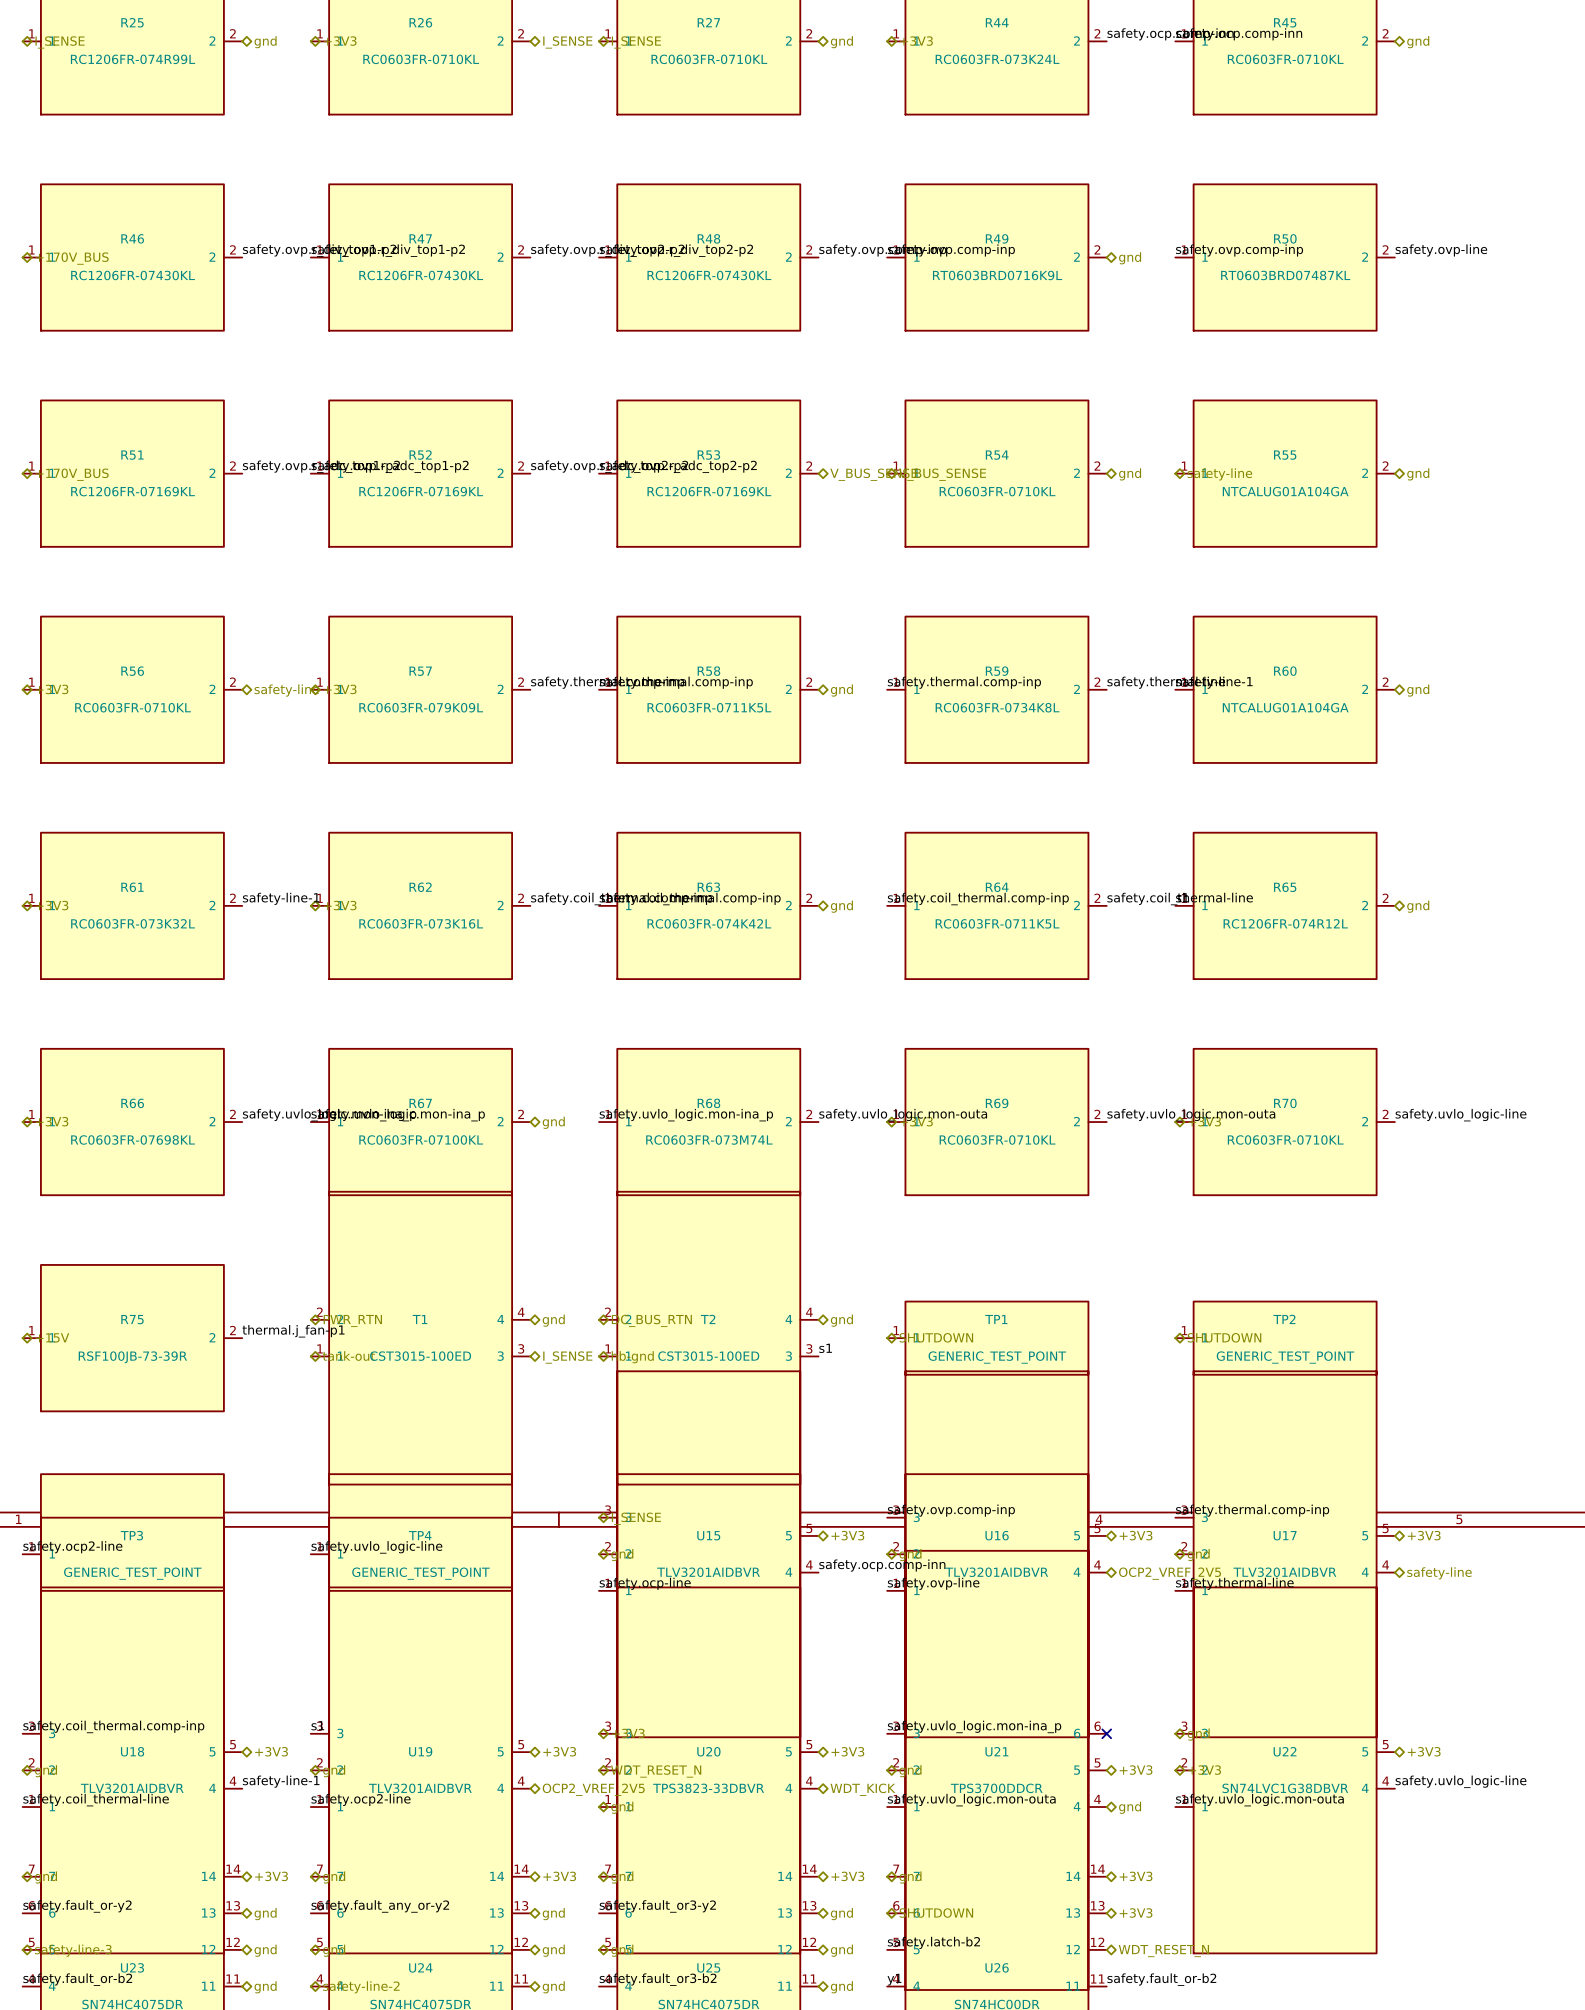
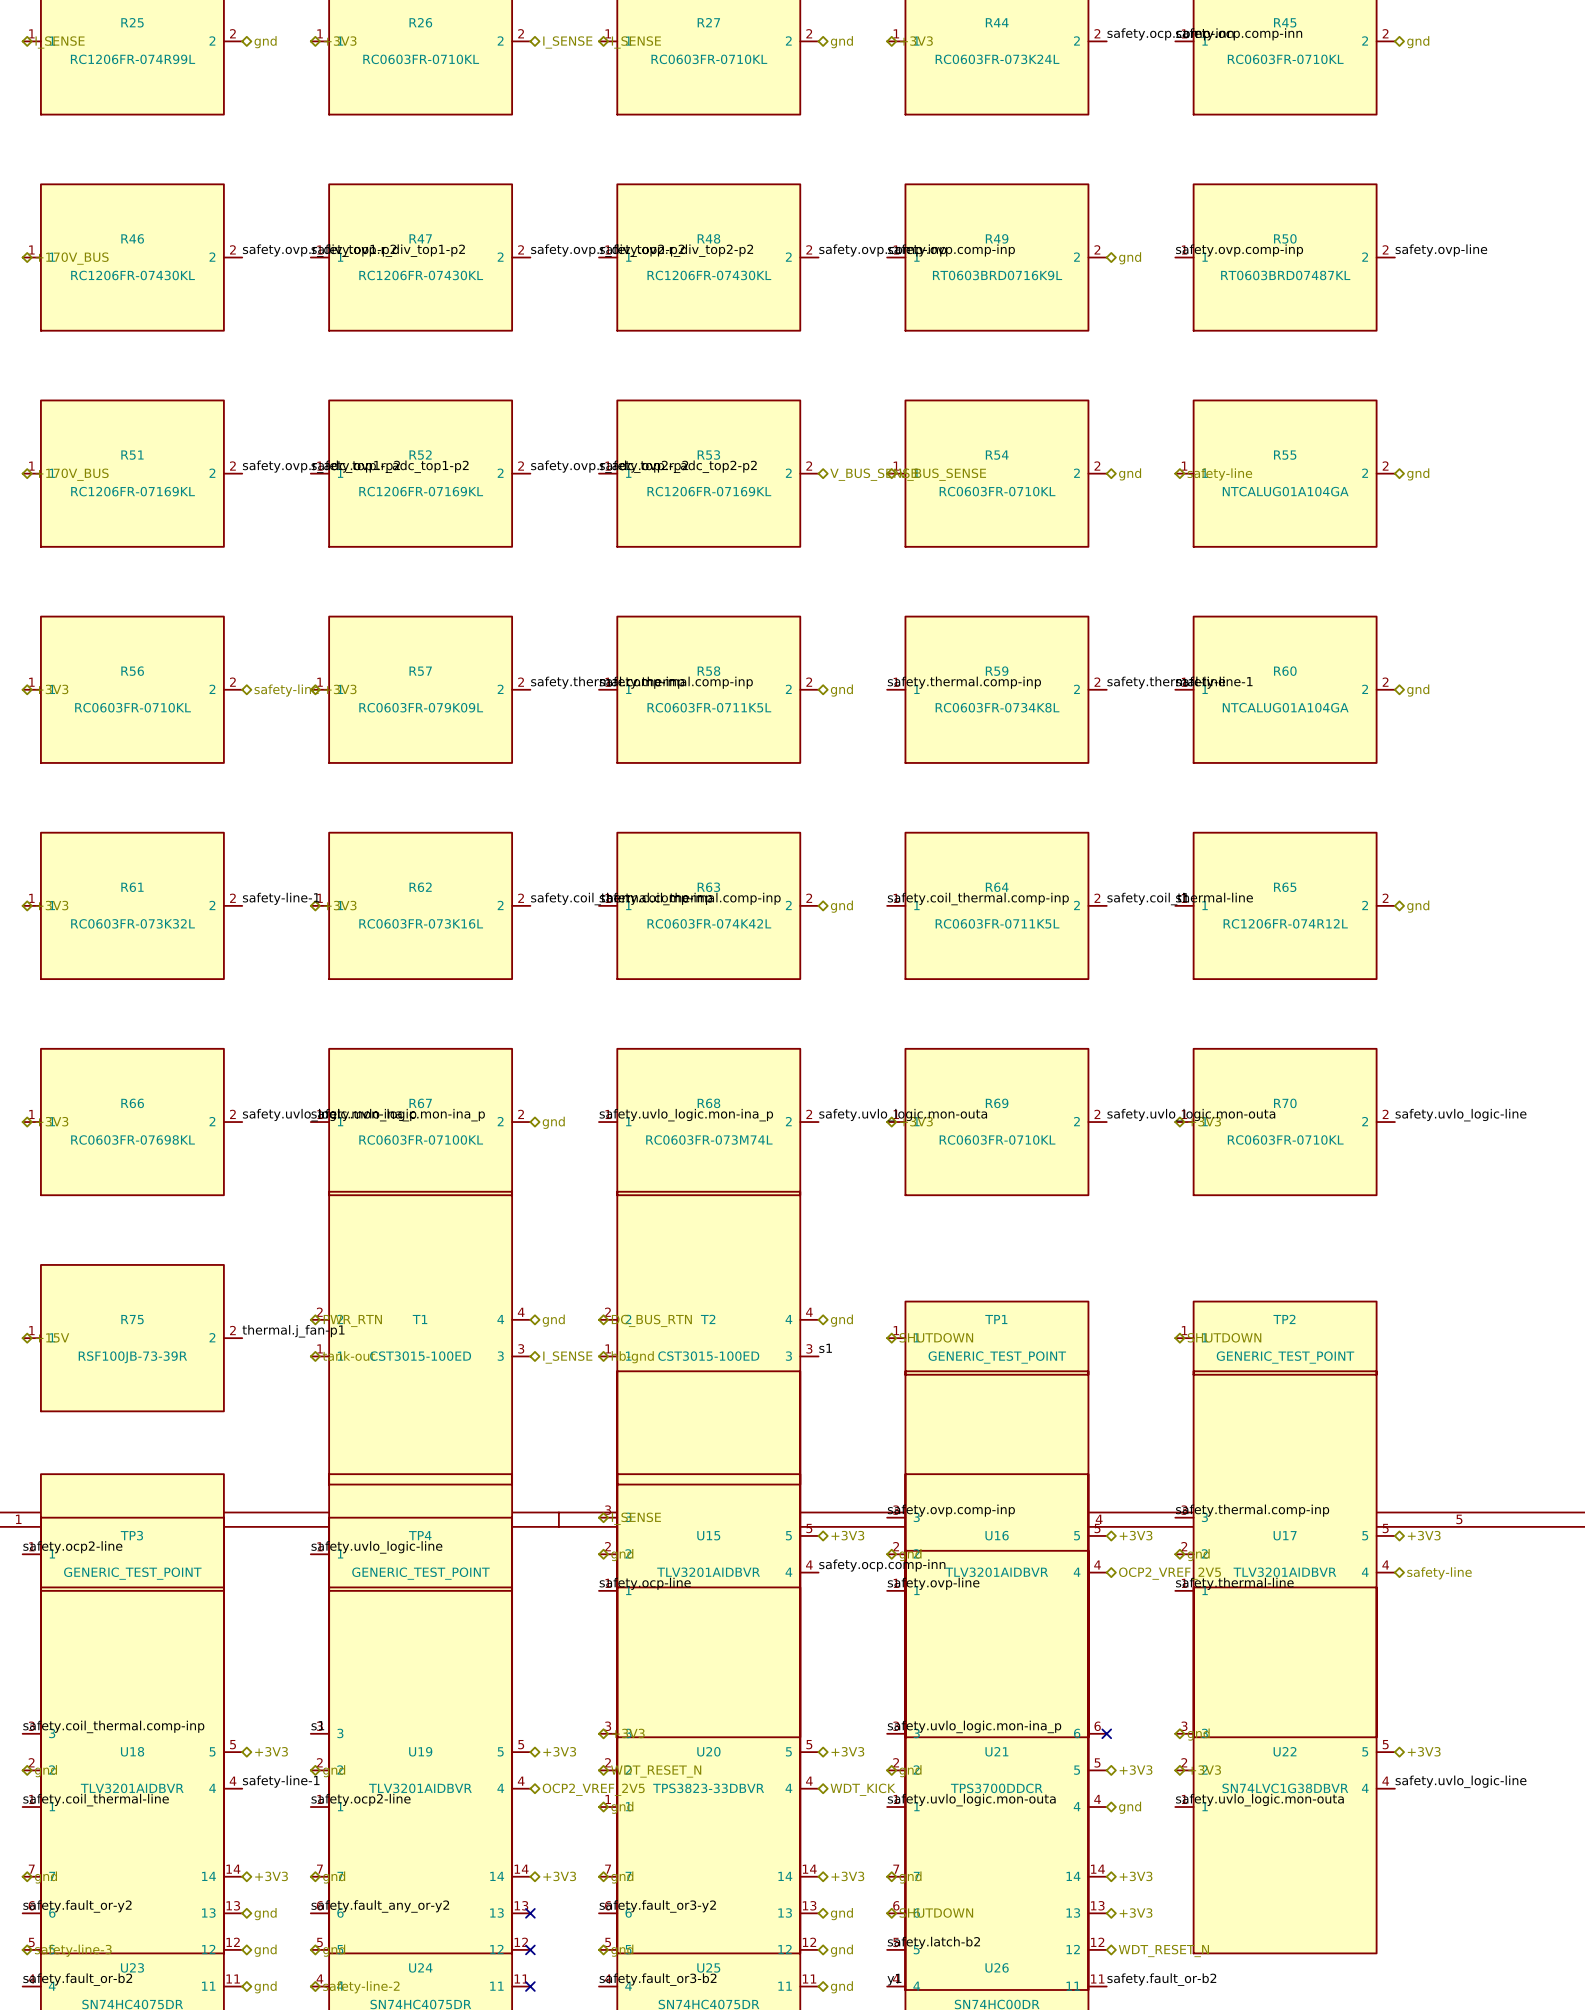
no-connect mark: none -> (530, 1913)
hierarchical label: gnd (553, 1914) -> none
no-connect mark: none -> (530, 1949)
hierarchical label: gnd (553, 1950) -> none
no-connect mark: none -> (530, 1986)
hierarchical label: gnd (553, 1987) -> none

